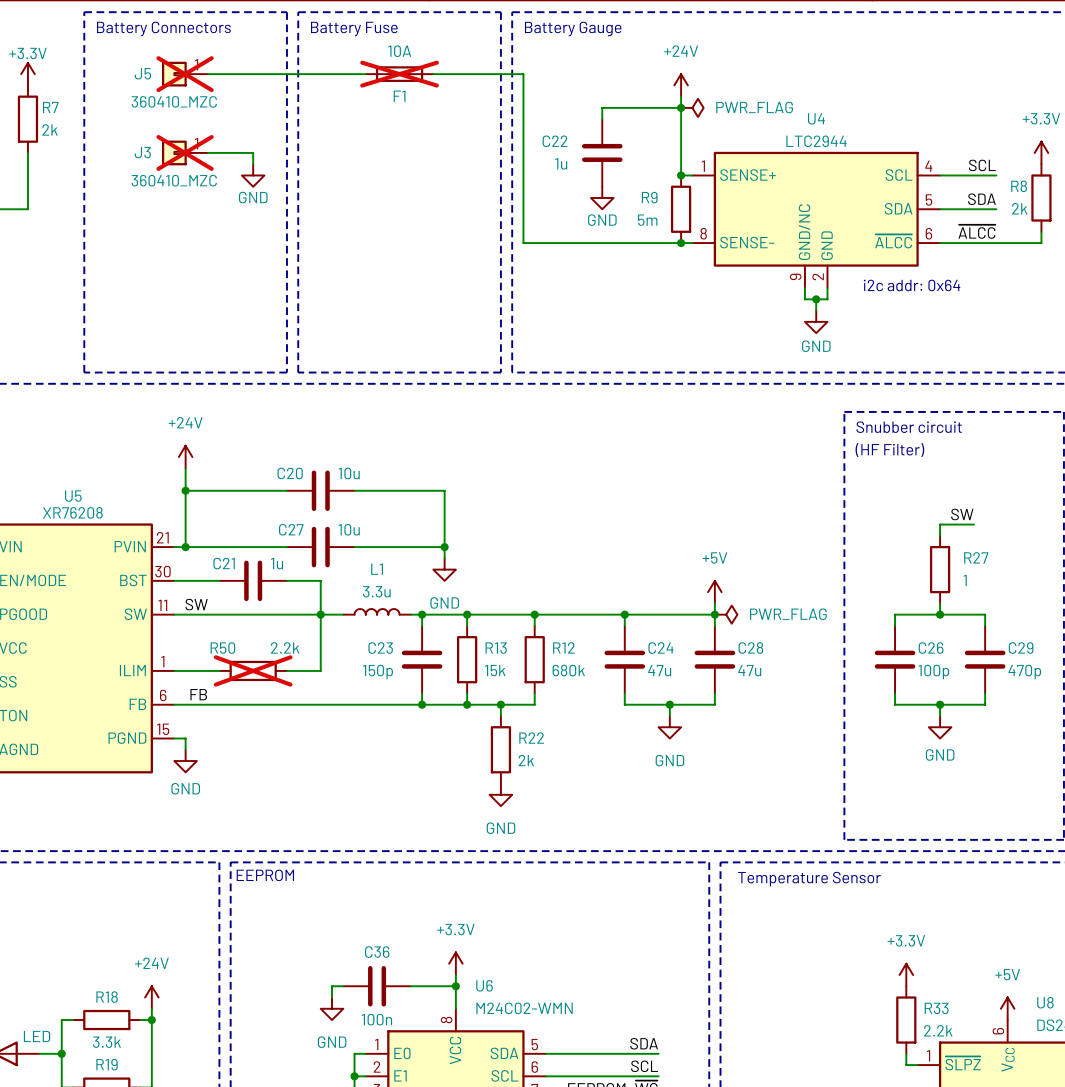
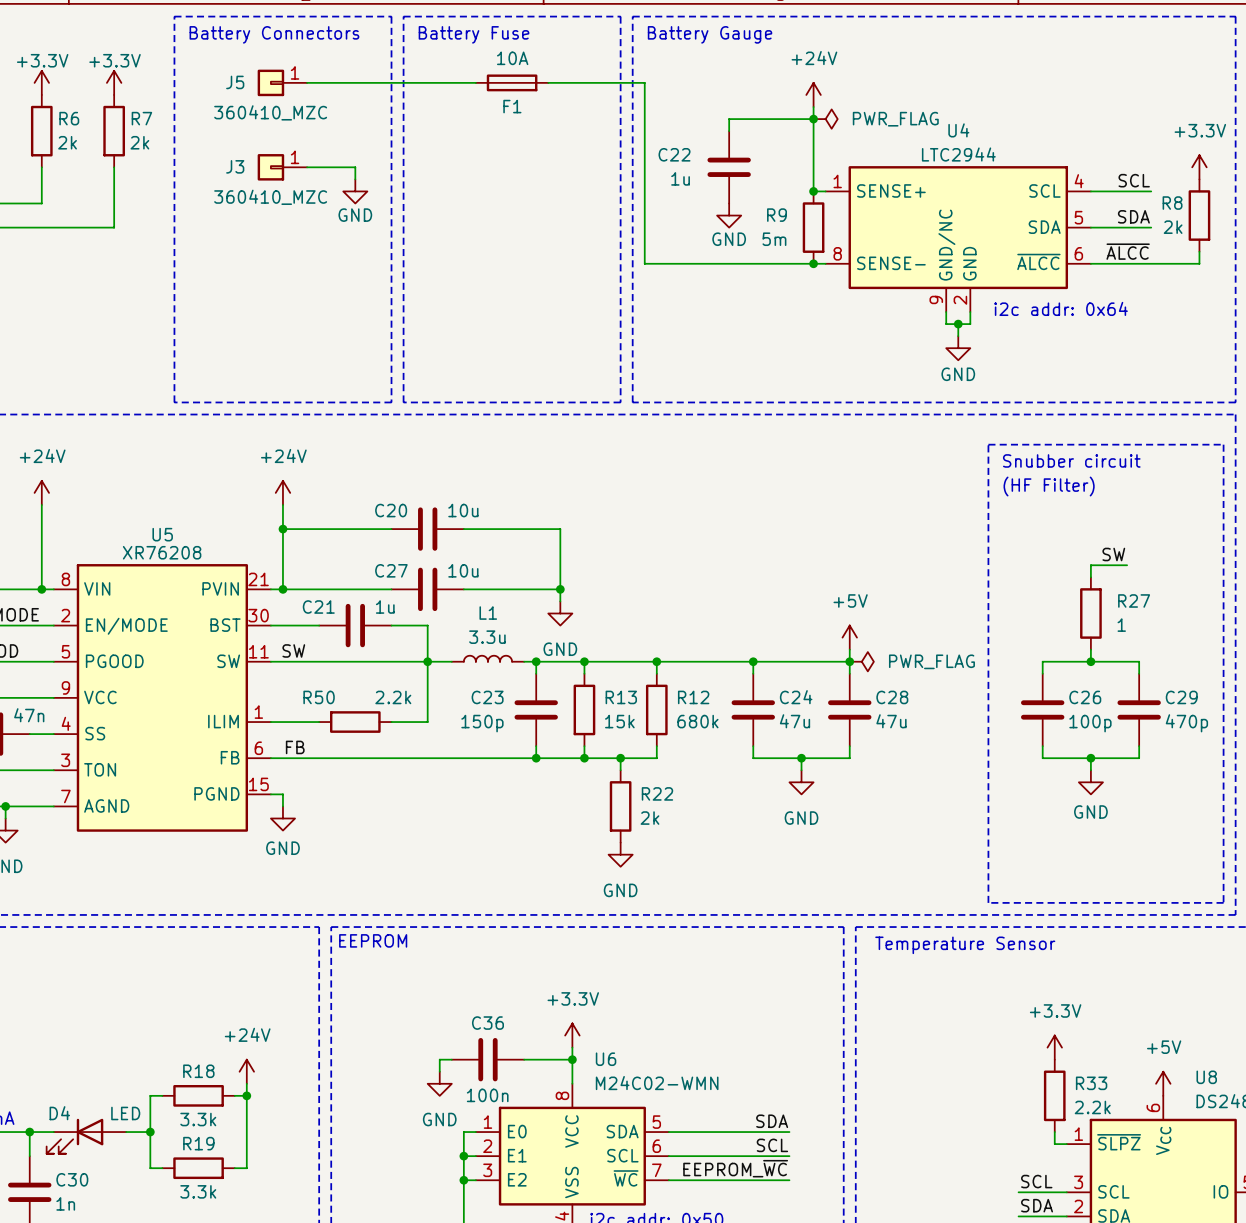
J5 do-not-place cross: (185, 74) -> none
F1 do-not-place cross: (399, 74) -> none
J3 do-not-place cross: (185, 152) -> none
R50 do-not-place cross: (253, 670) -> none

